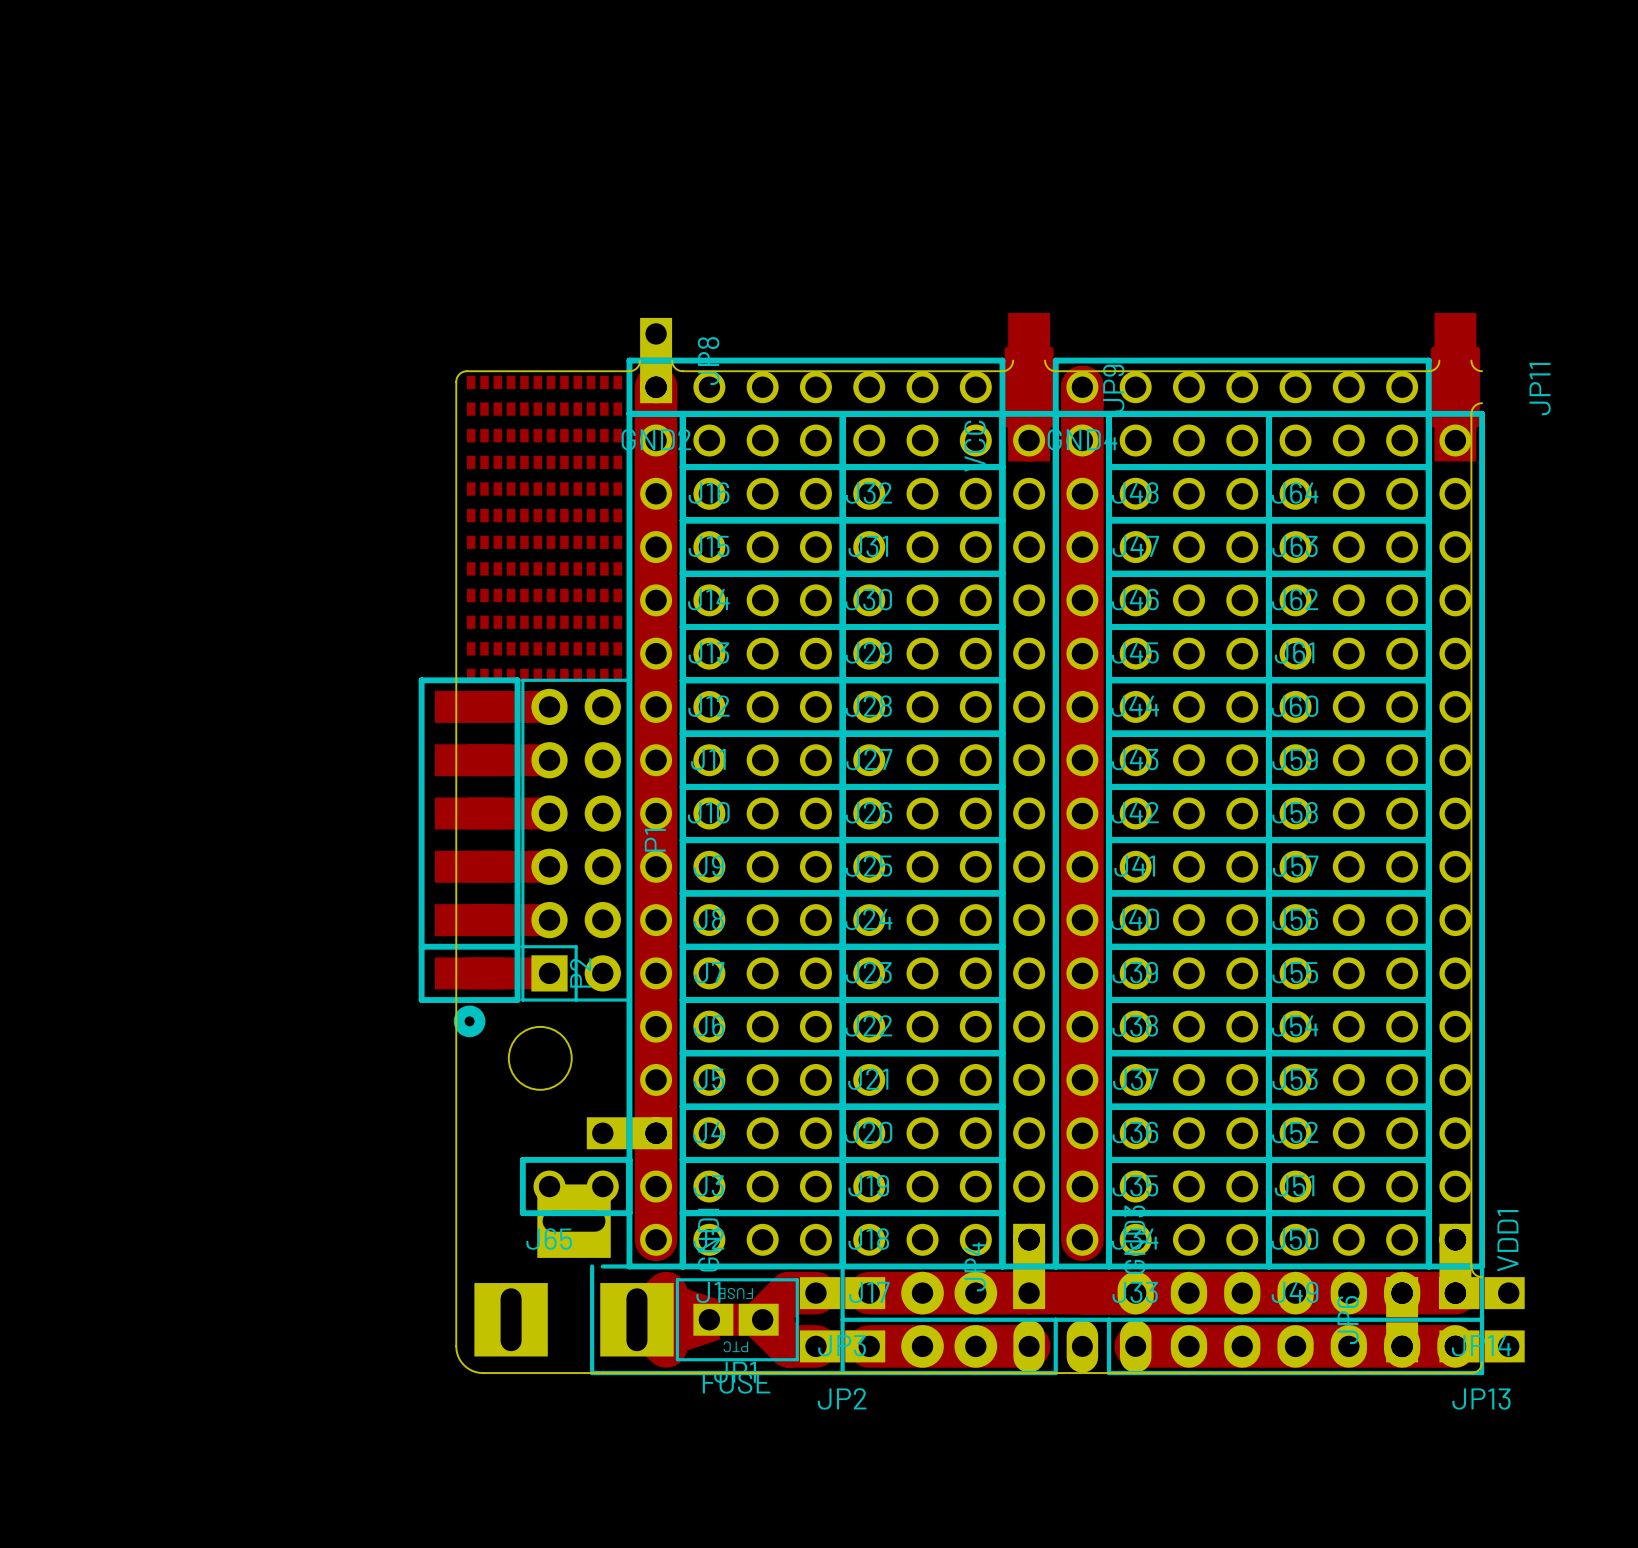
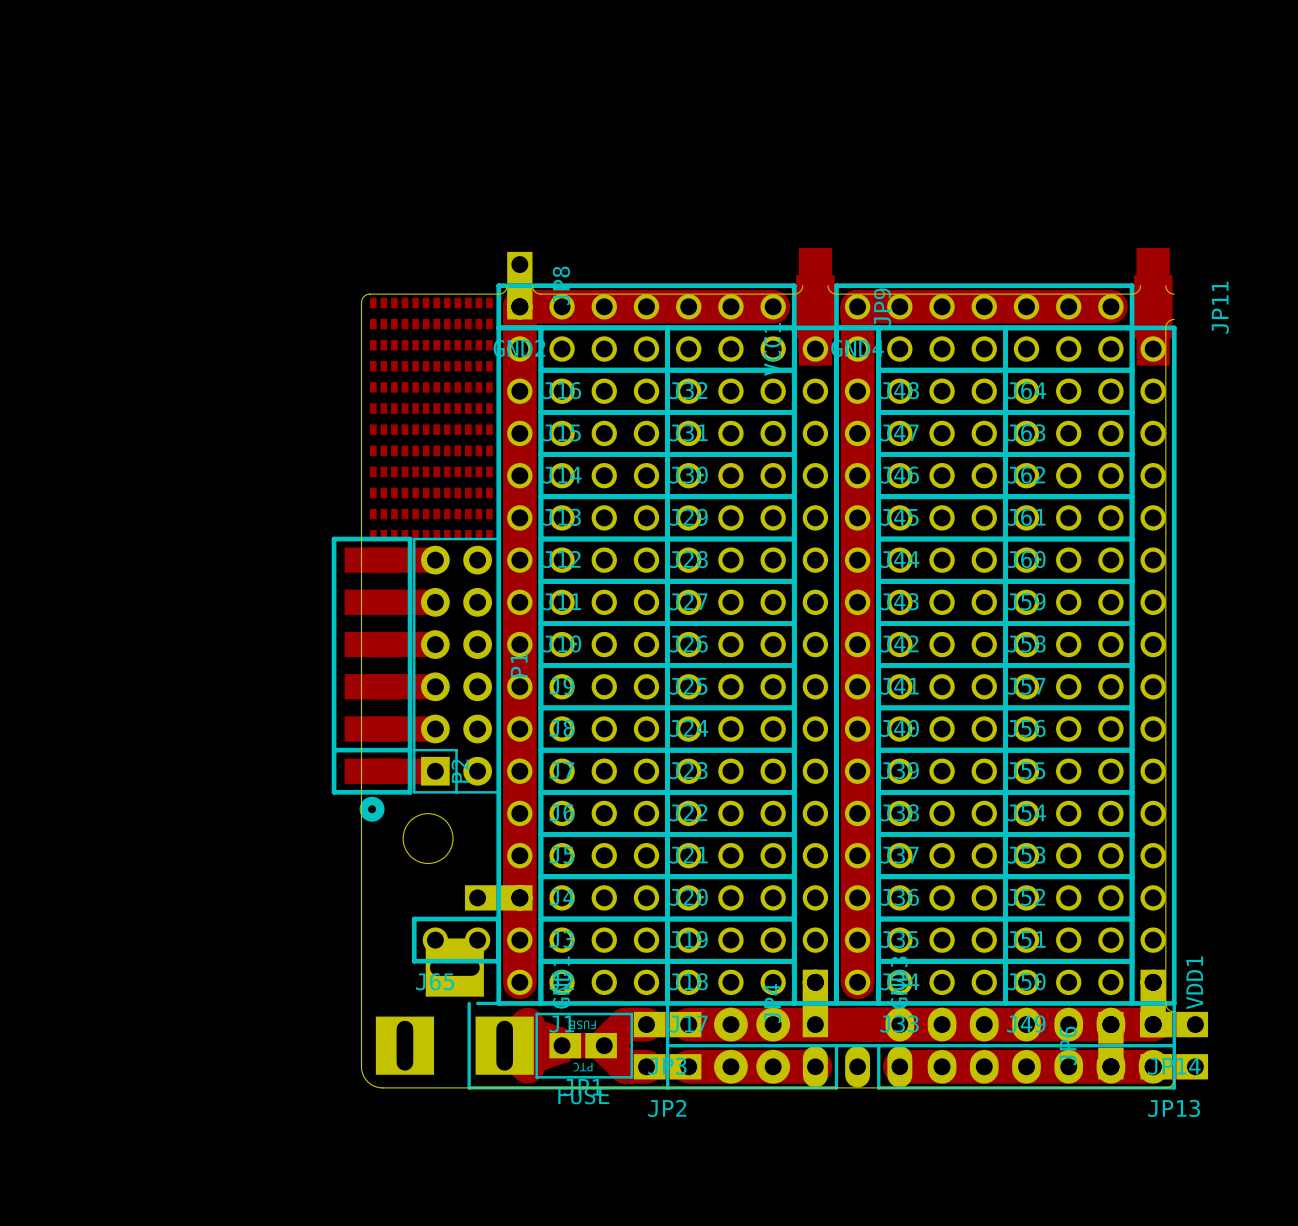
track: none -> (519, 306) (773, 306)
track: none -> (857, 306) (1110, 306)

